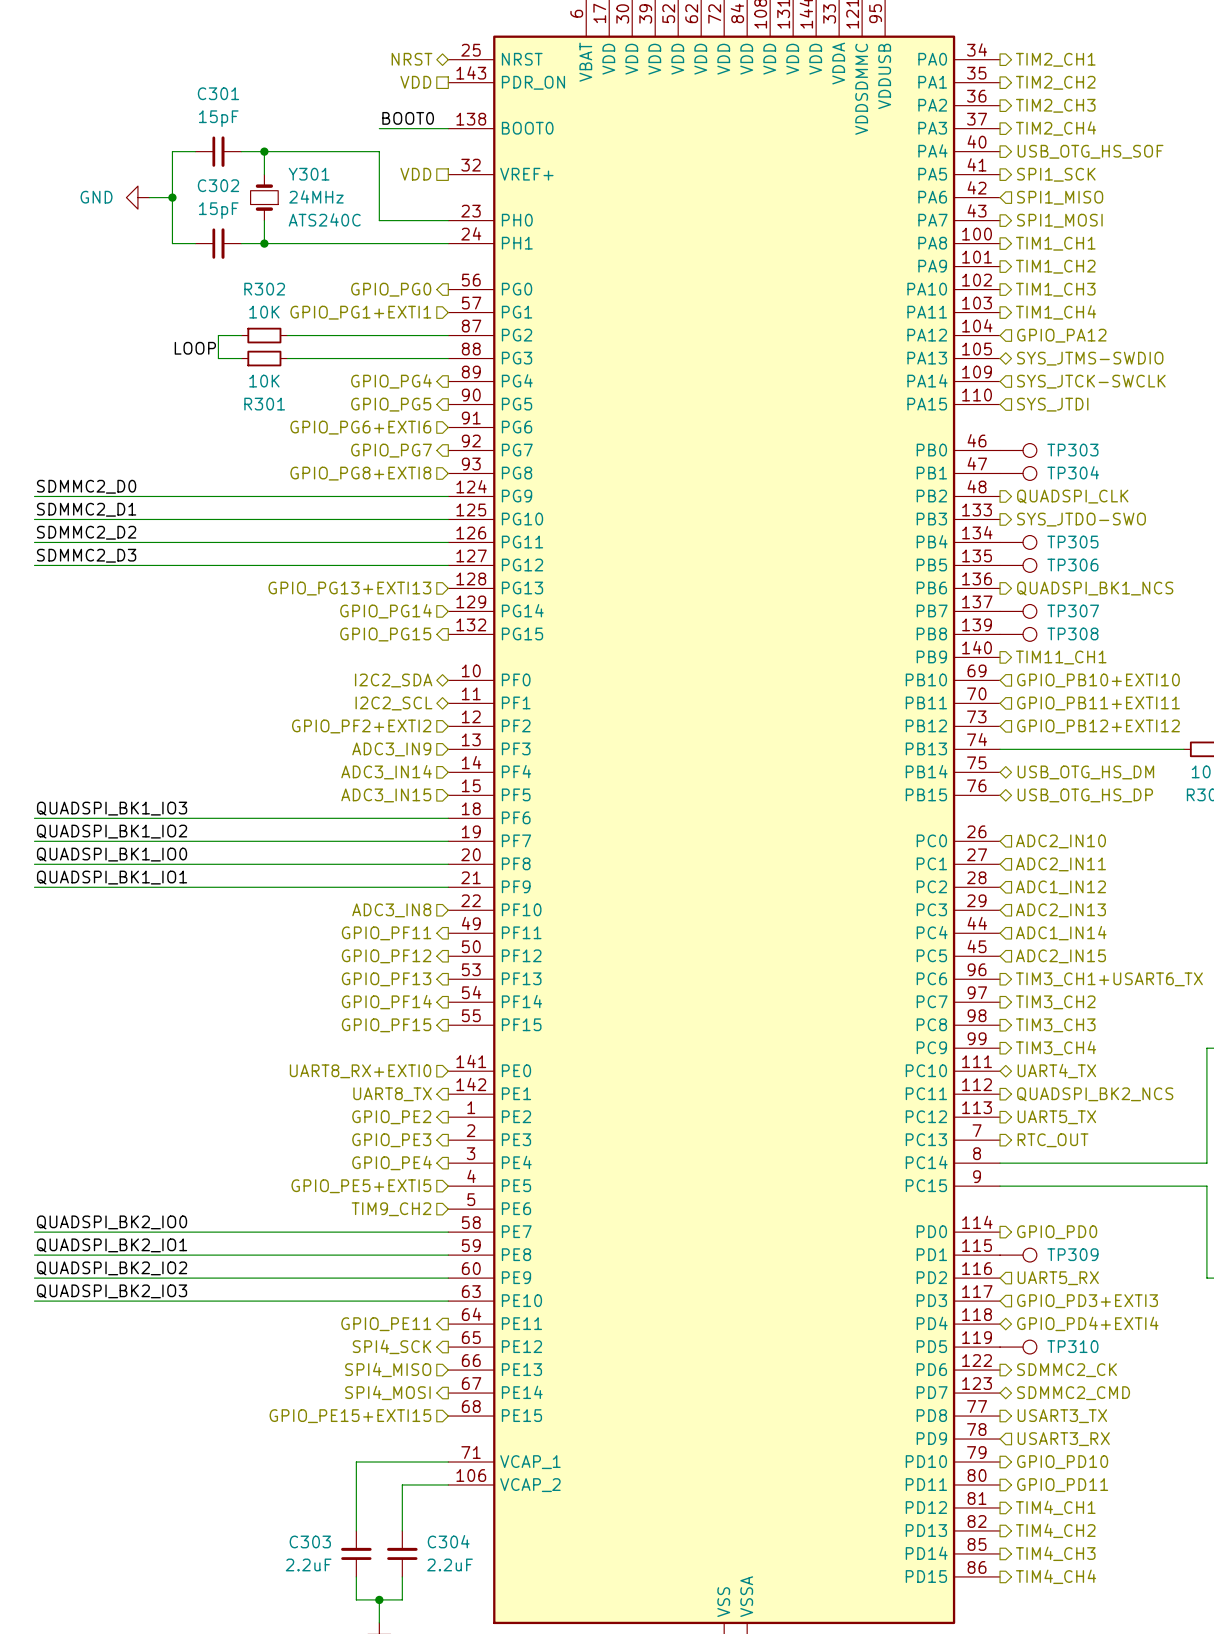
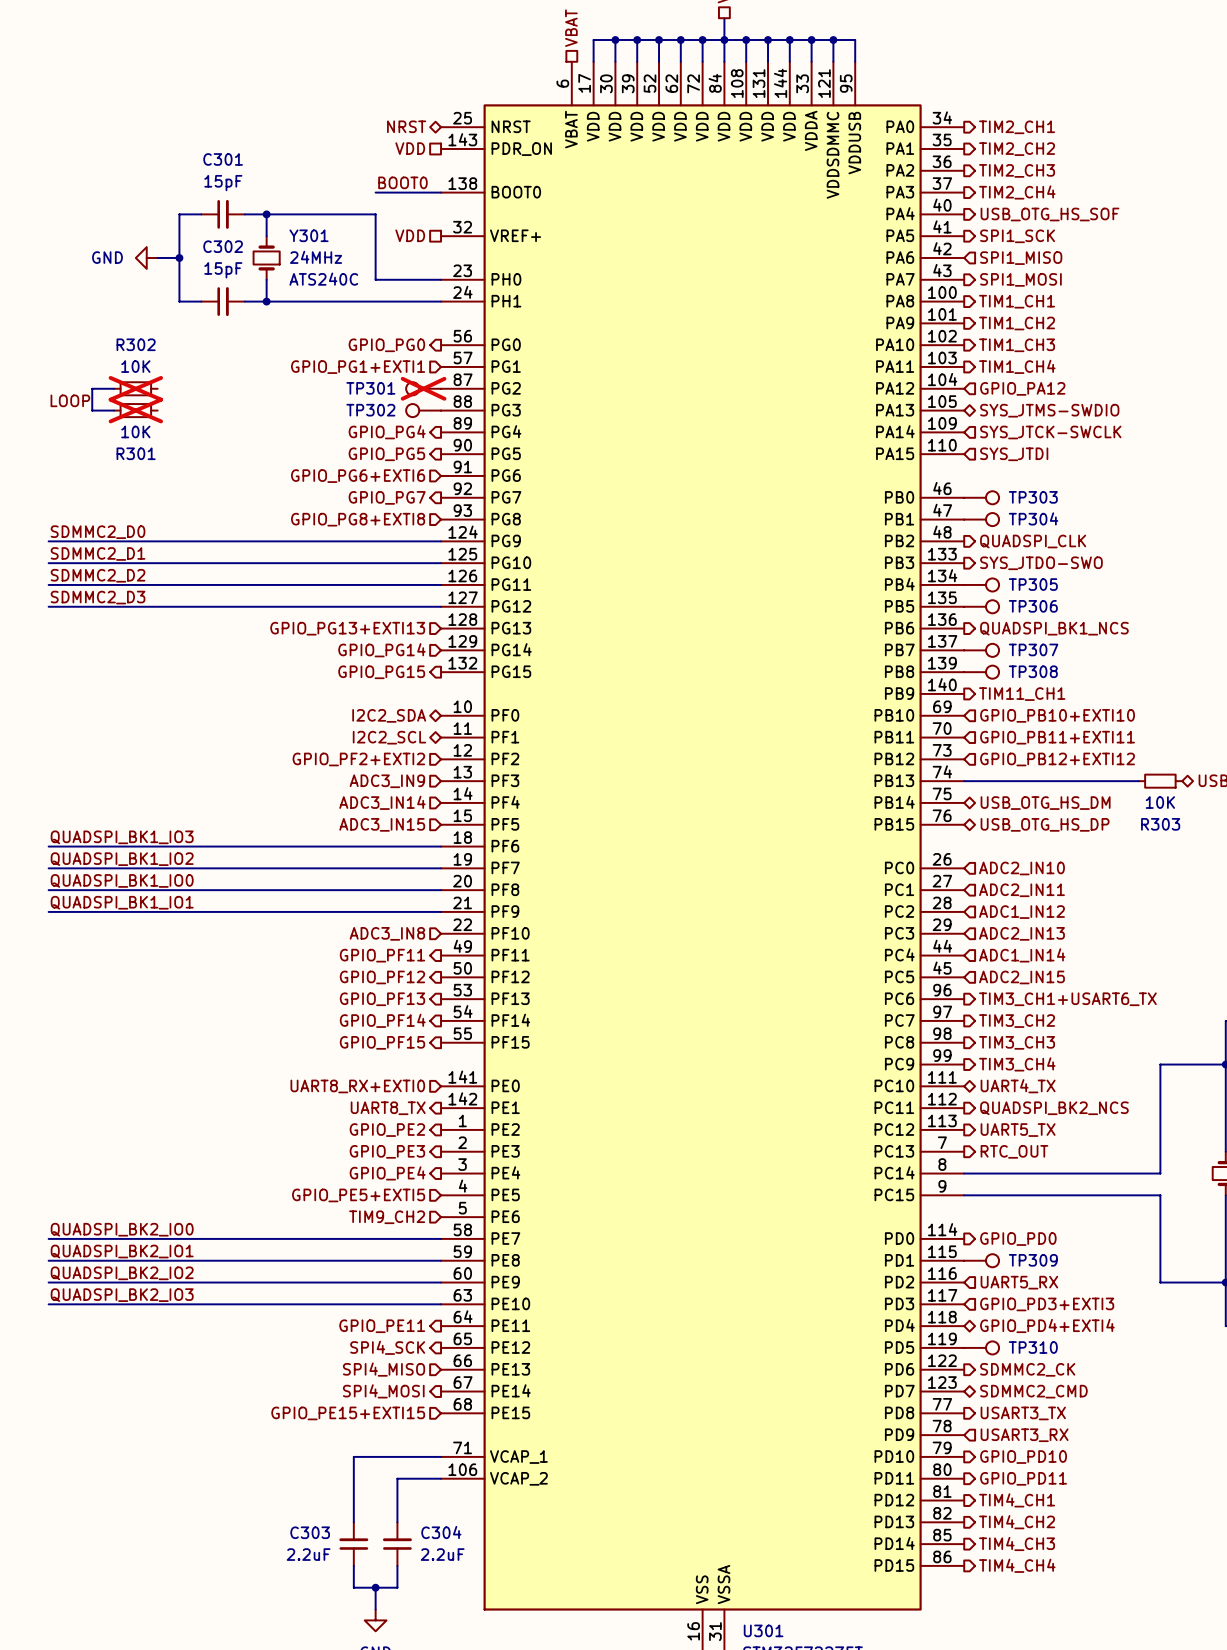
R302 do-not-place cross: none -> (135, 388)
wire: (241, 335) (218, 335) (218, 358) (241, 358) -> (114, 388) (92, 388) (92, 410) (114, 410)
R302 position: (264, 335) -> (135, 388)
wire: (287, 335) (448, 335) -> none
TP301: none -> (423, 388)
label position: LOOP (195, 348) -> LOOP (70, 400)
R301 do-not-place cross: none -> (135, 410)
R301 position: (264, 358) -> (135, 410)
wire: (287, 358) (448, 358) -> none
TP302: none -> (423, 410)

